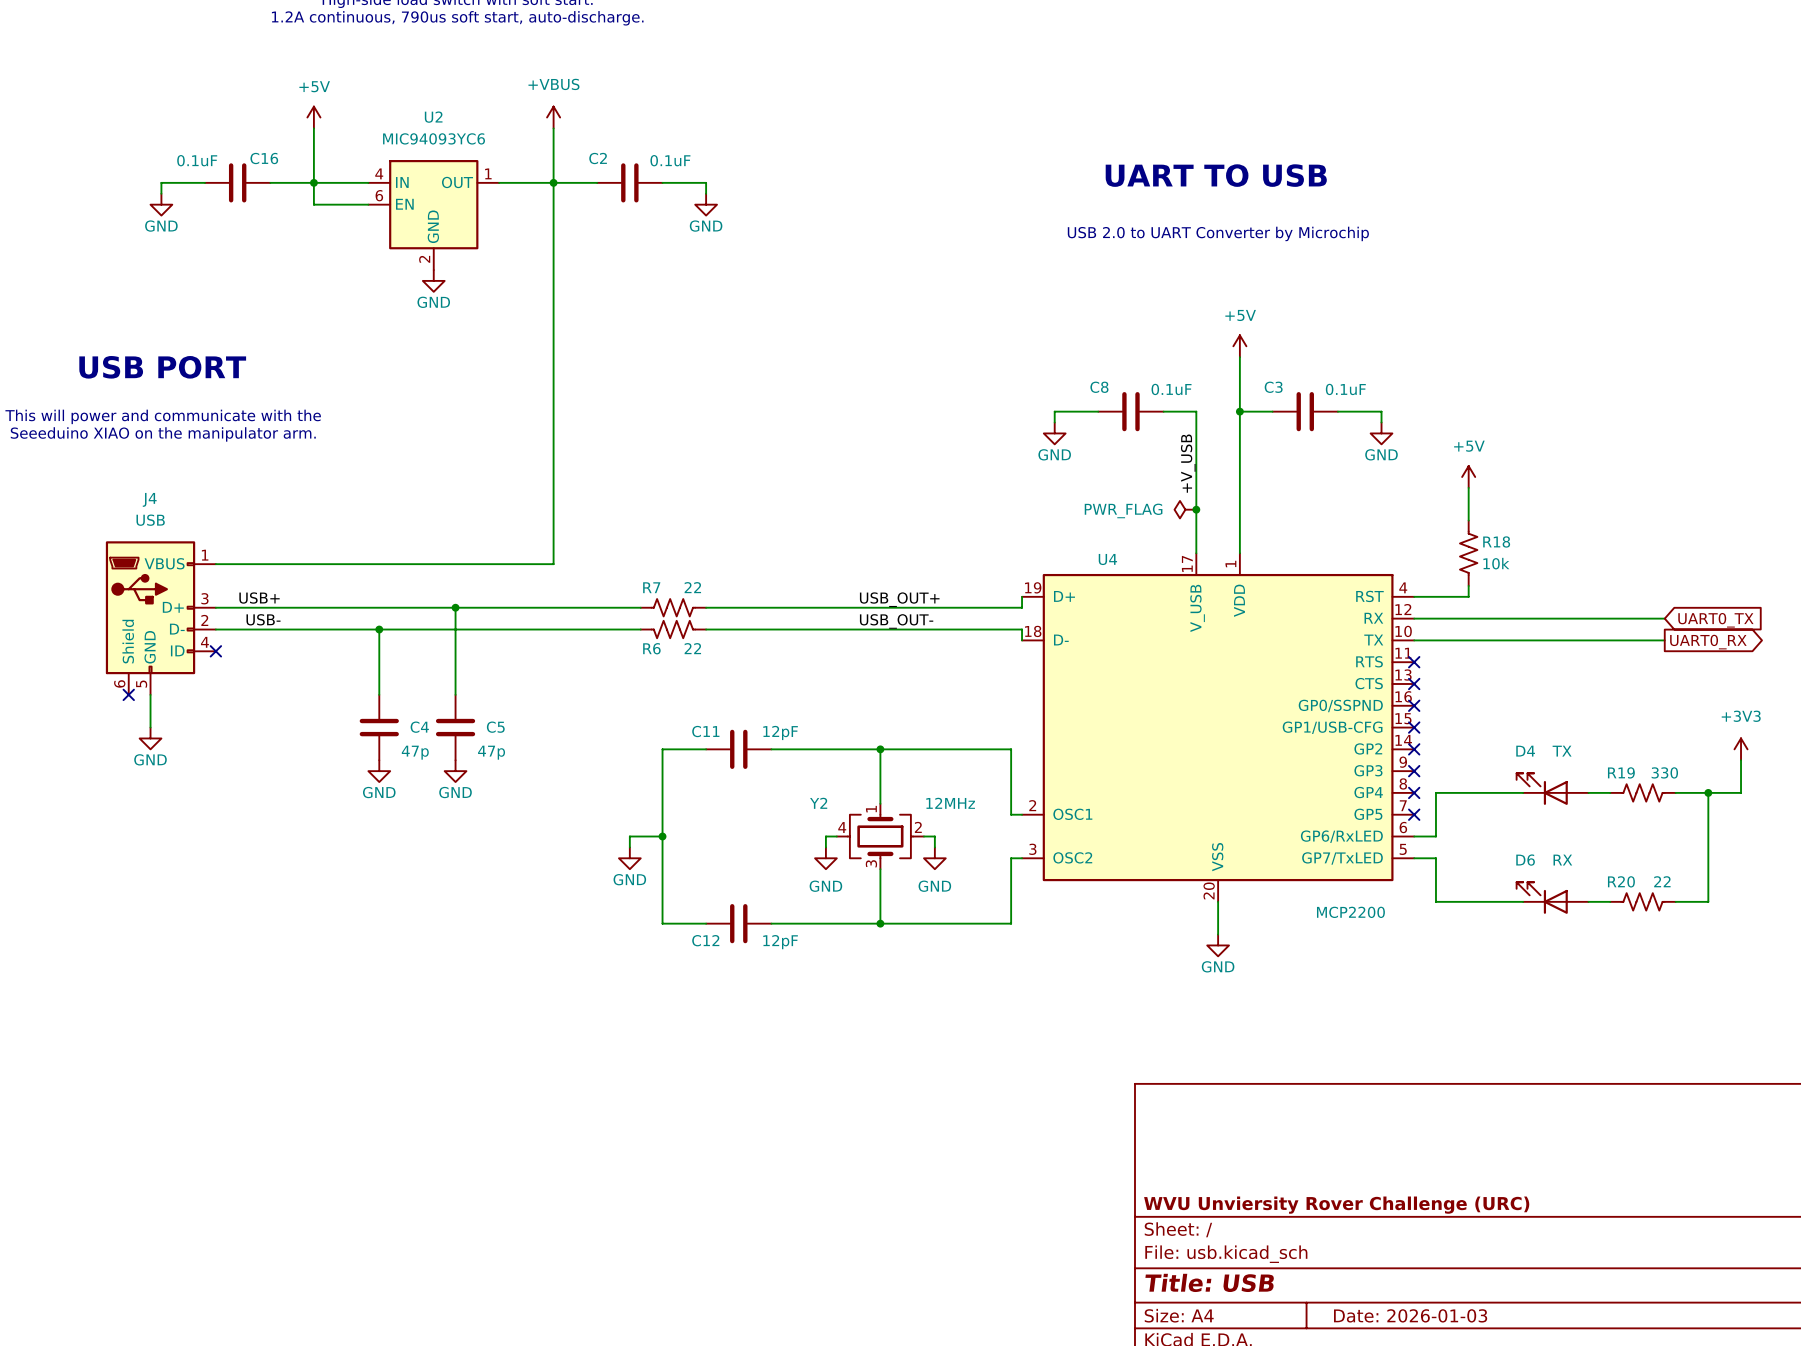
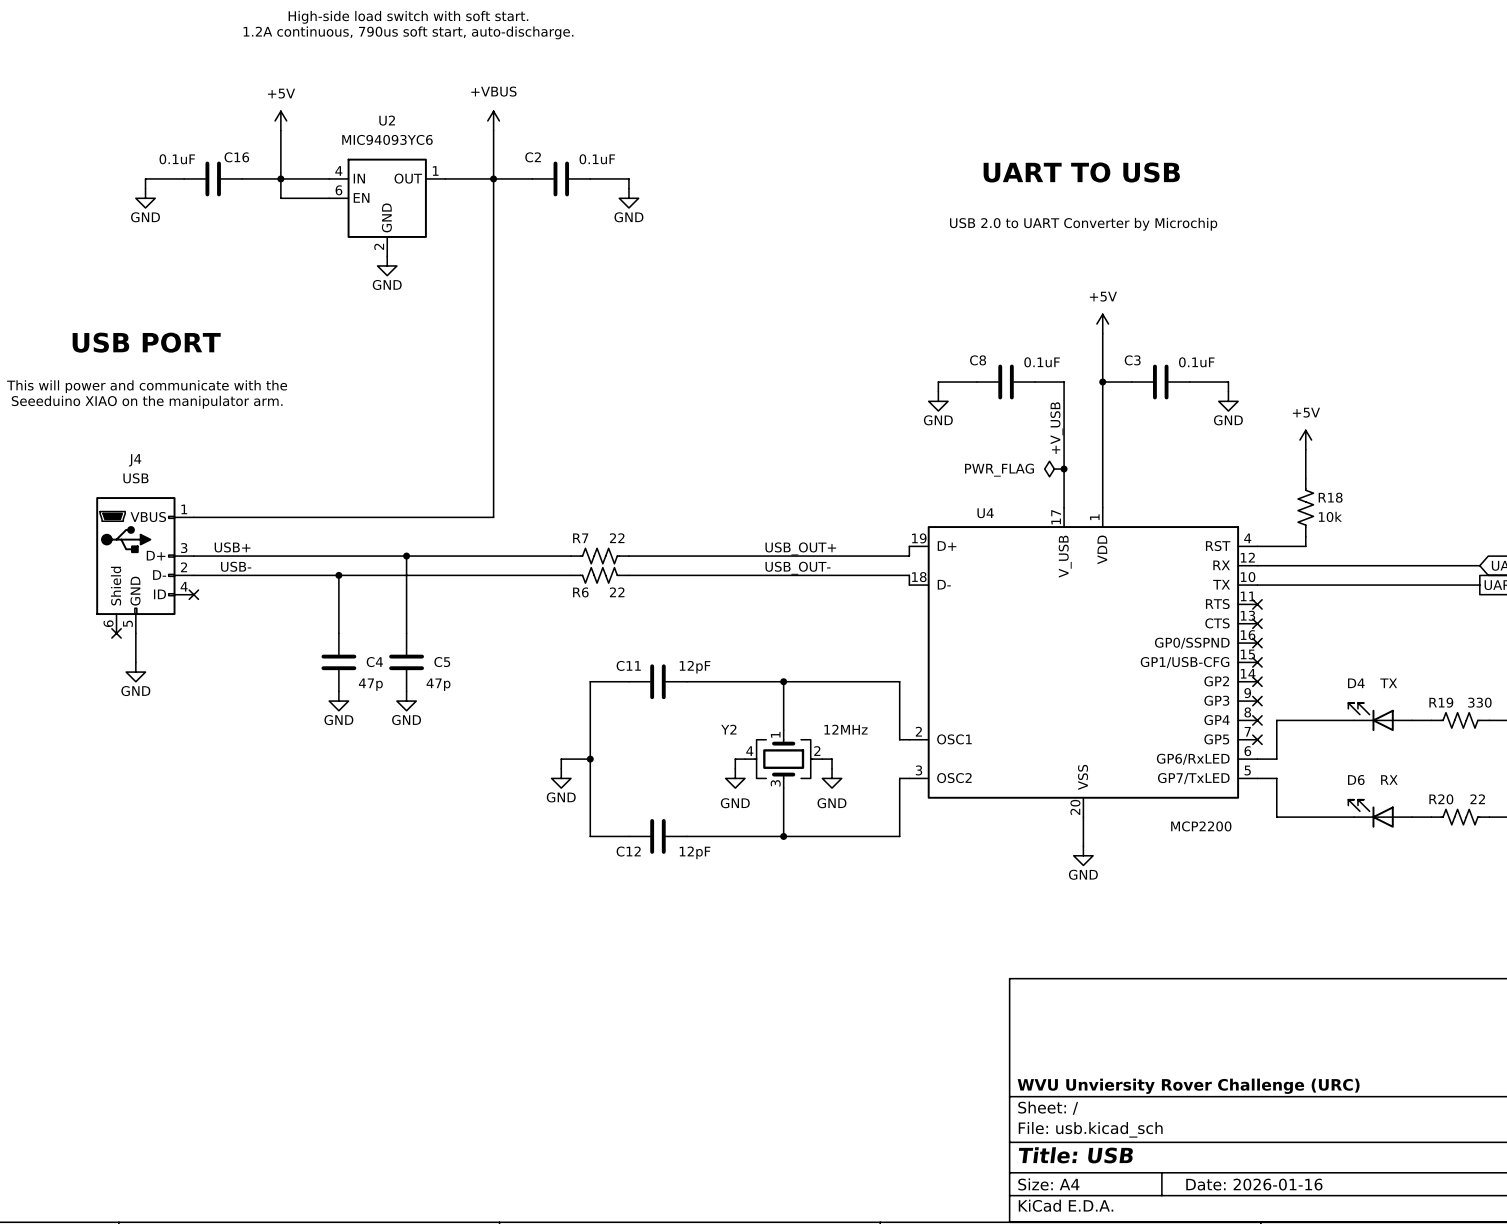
title block: Date: 2026-01-03 (1410, 1315) -> Date: 2026-01-16 (1254, 1184)

